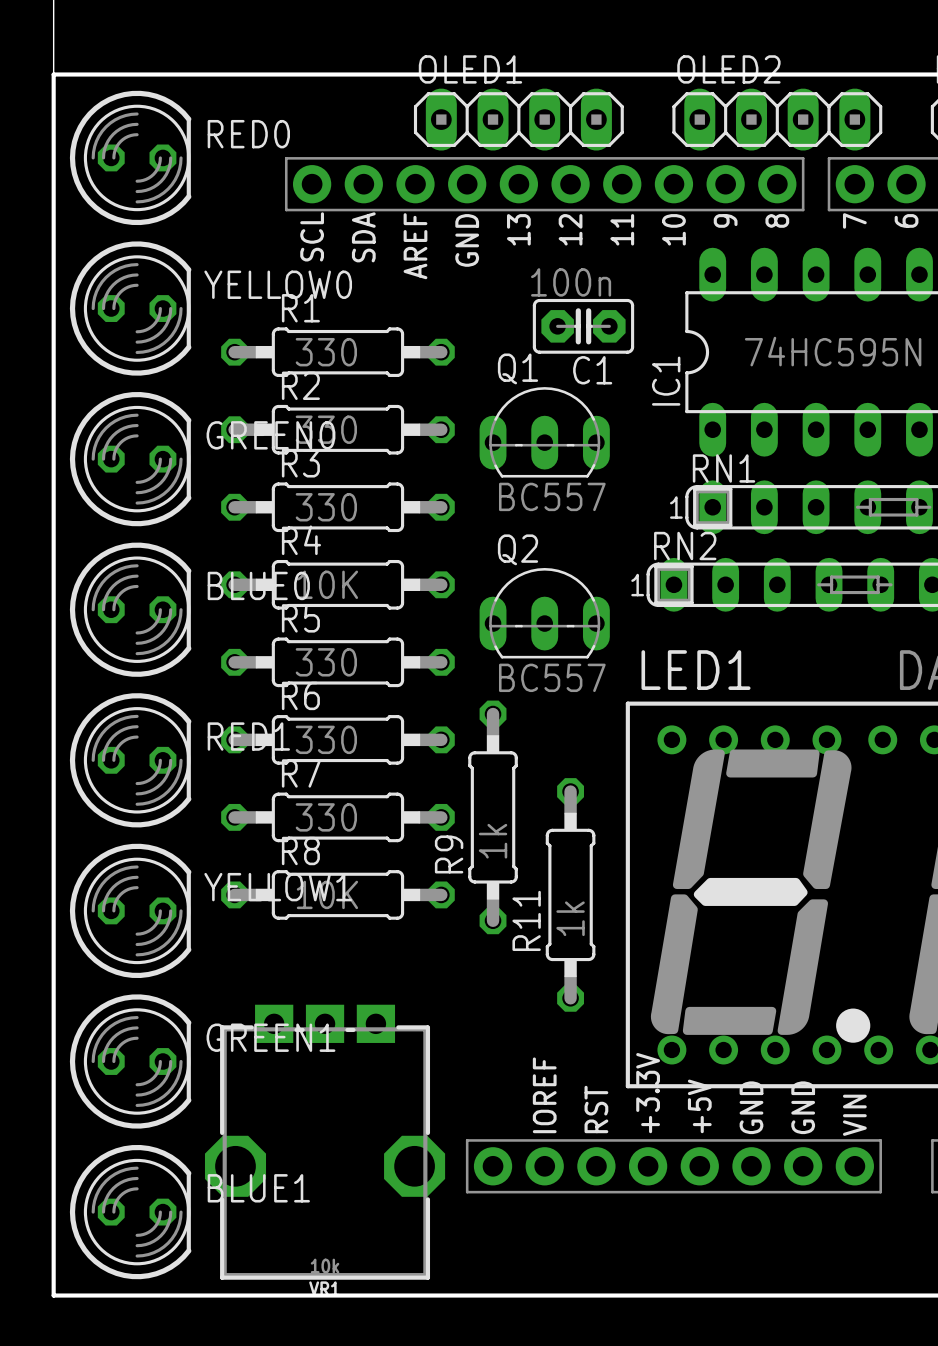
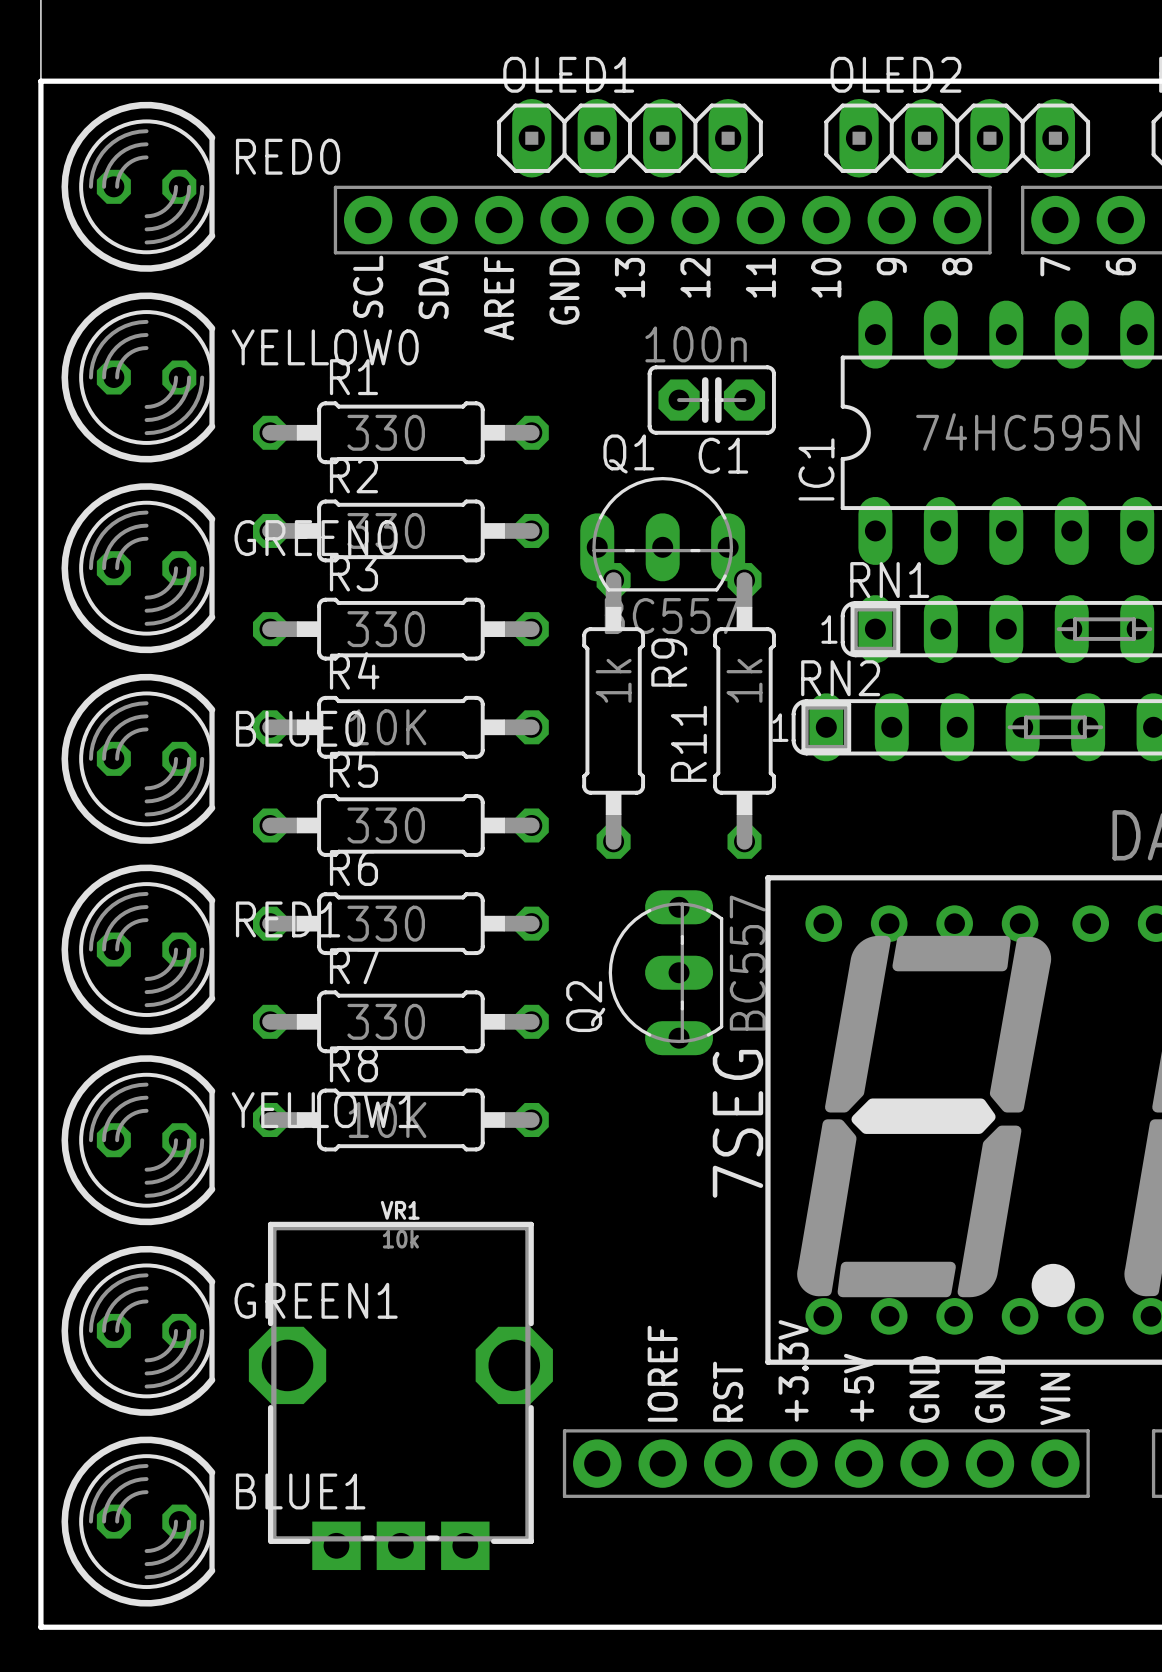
Q2 rotation: 0° (544, 613) -> 90° counterclockwise (665, 972)
Q2 position: (544, 613) -> (665, 972)
LED1 name: LED1 (696, 670) -> 7SEG (737, 1123)
R9 position: (493, 817) -> (613, 710)
R9 value position: 1k (493, 841) -> 1k (613, 680)
R9 name position: R9 (449, 854) -> R9 (669, 662)
R11 position: (570, 894) -> (744, 710)
R11 value position: 1k (570, 918) -> 1k (744, 680)
VR1 rotation: 0° (325, 1142) -> 180° (400, 1395)

